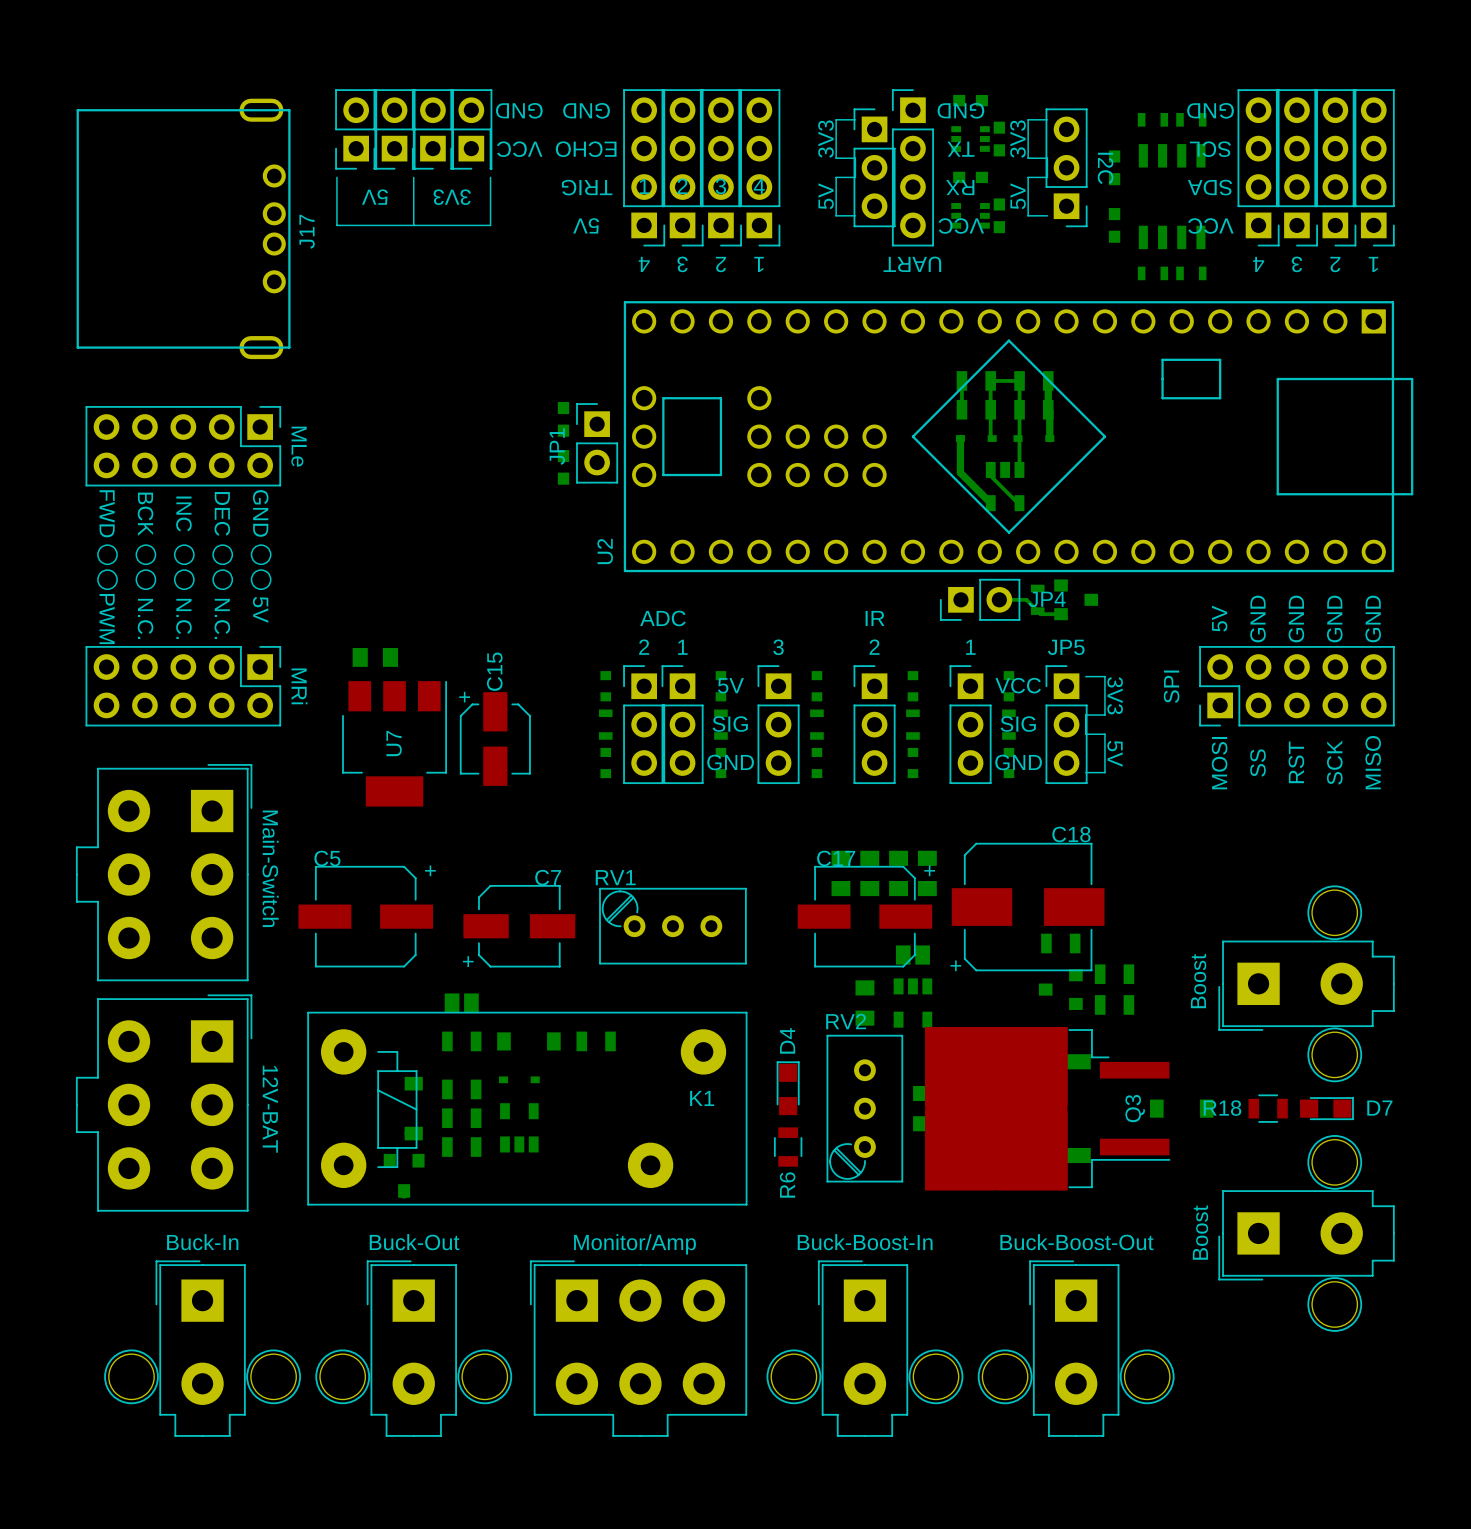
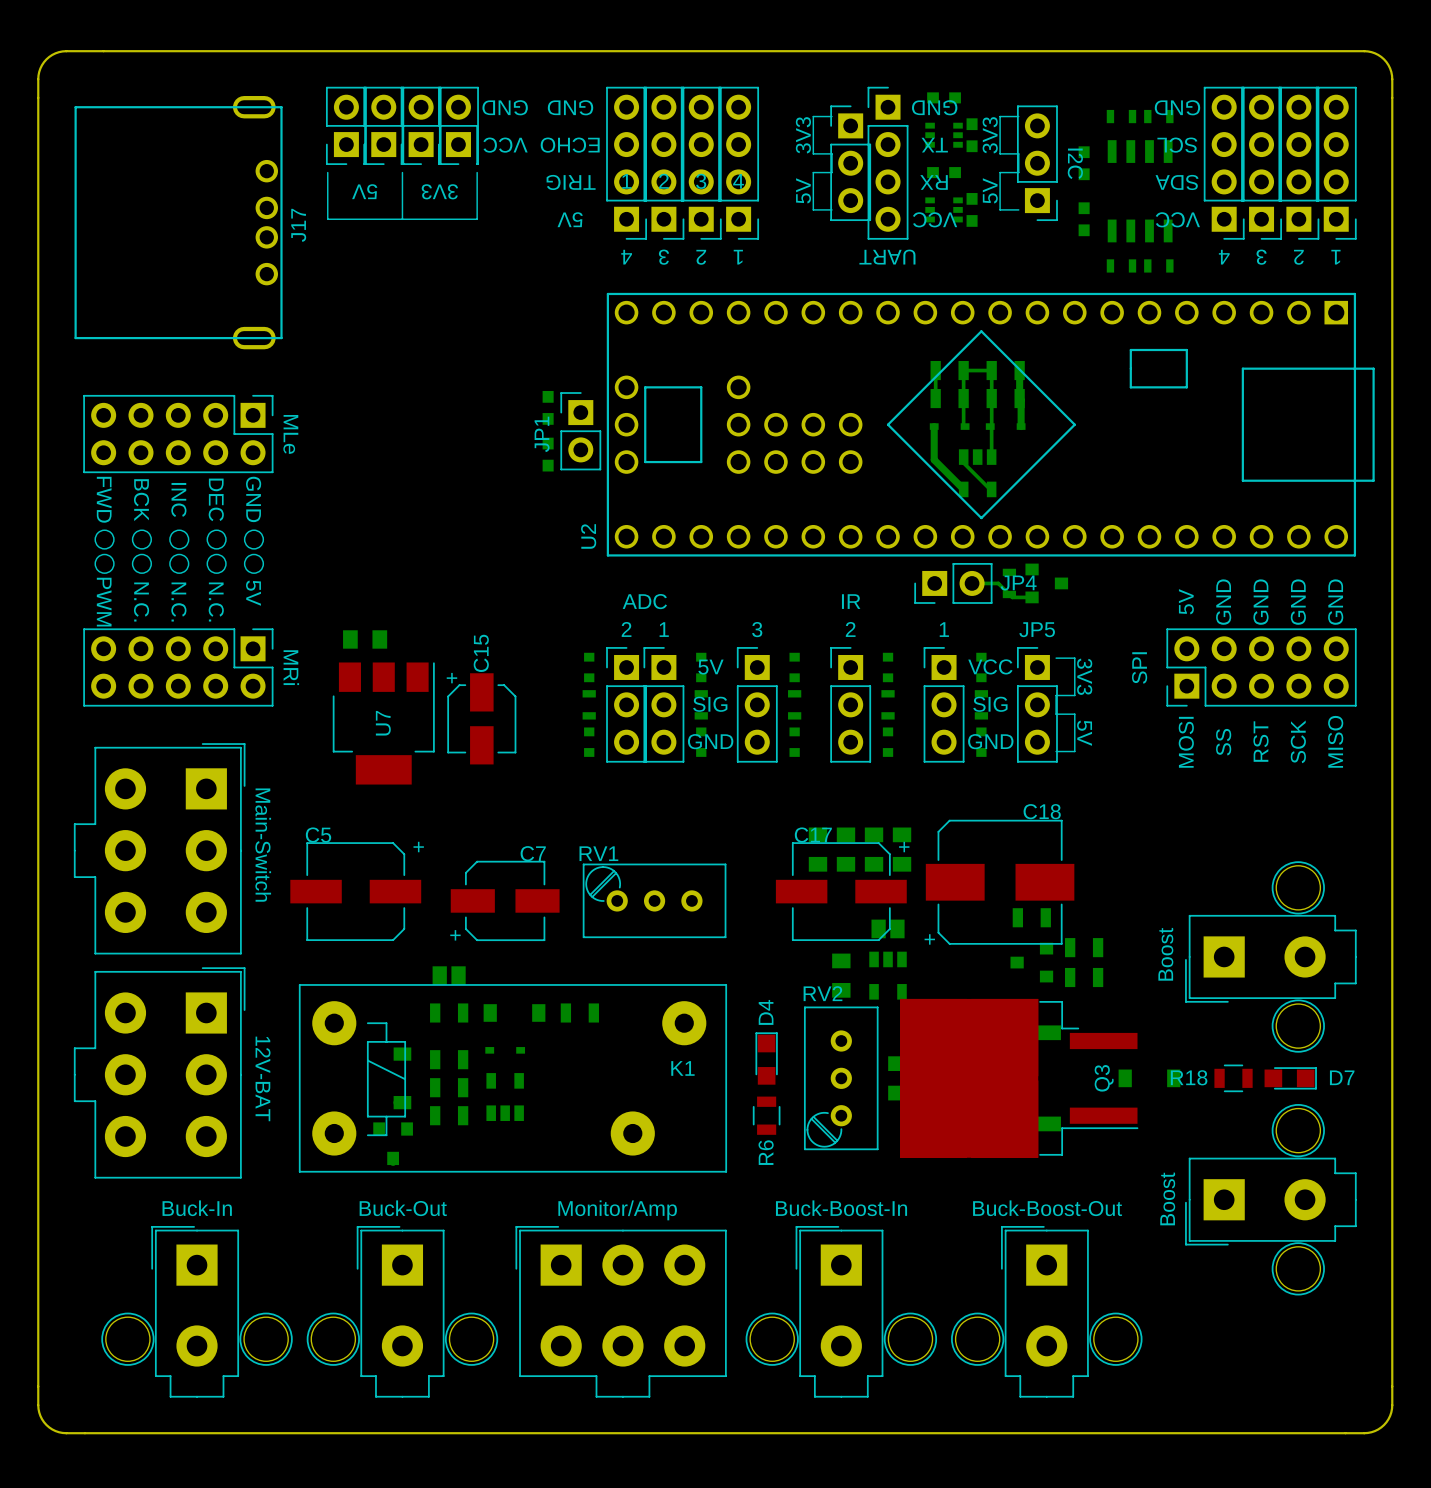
board edge: none -> (66, 51) (1364, 51) (1374, 53) (1384, 59) (1390, 68) (1392, 79) (1392, 1405) (1390, 1415) (1384, 1424) (1374, 1431) (1364, 1433) (66, 1433) (55, 1431) (46, 1424) (40, 1415) (38, 1405) (38, 79) (40, 68) (46, 59) (55, 53) (66, 51)

